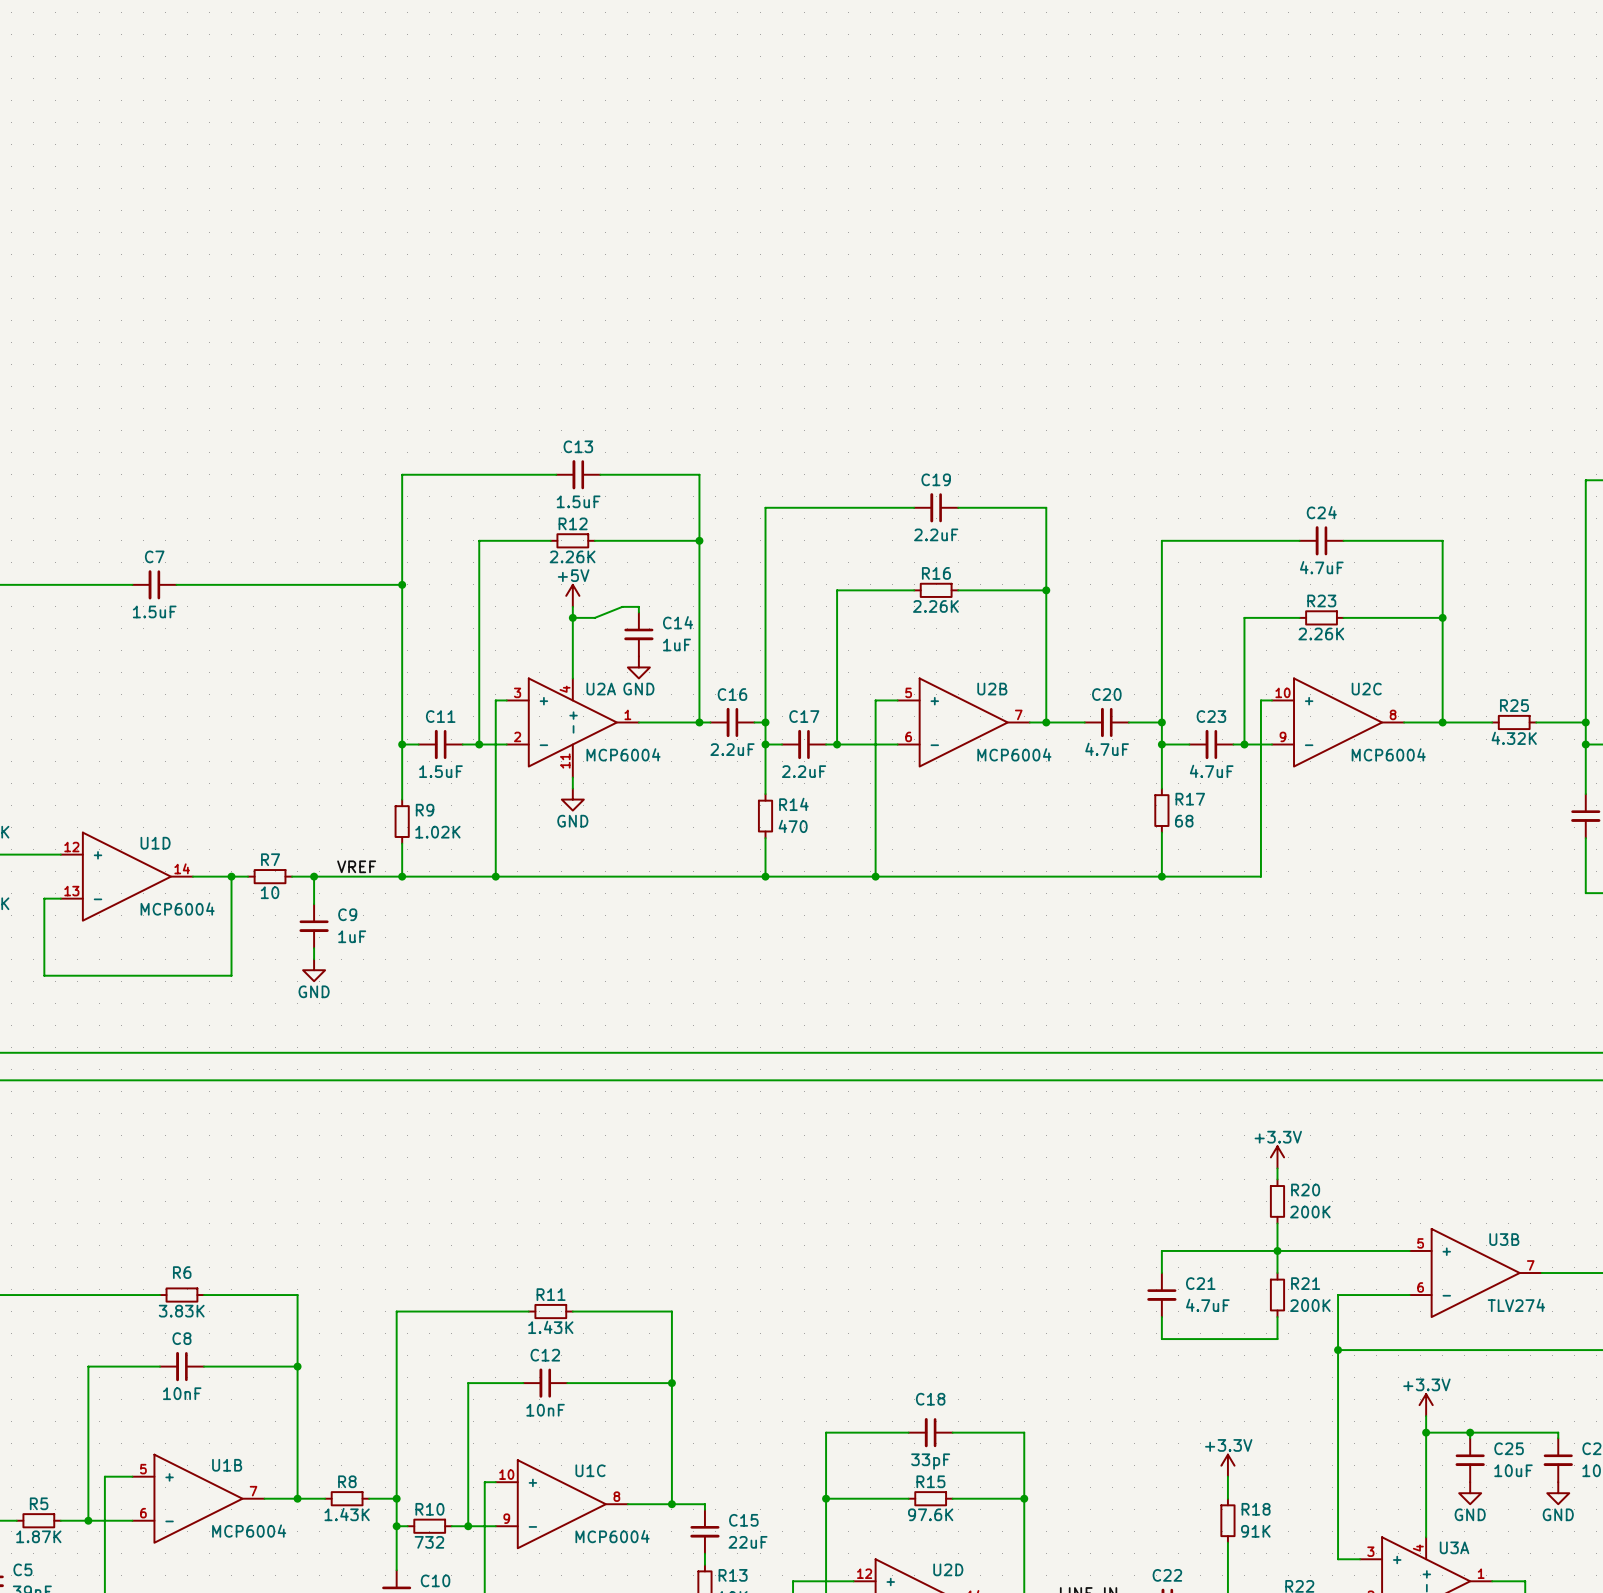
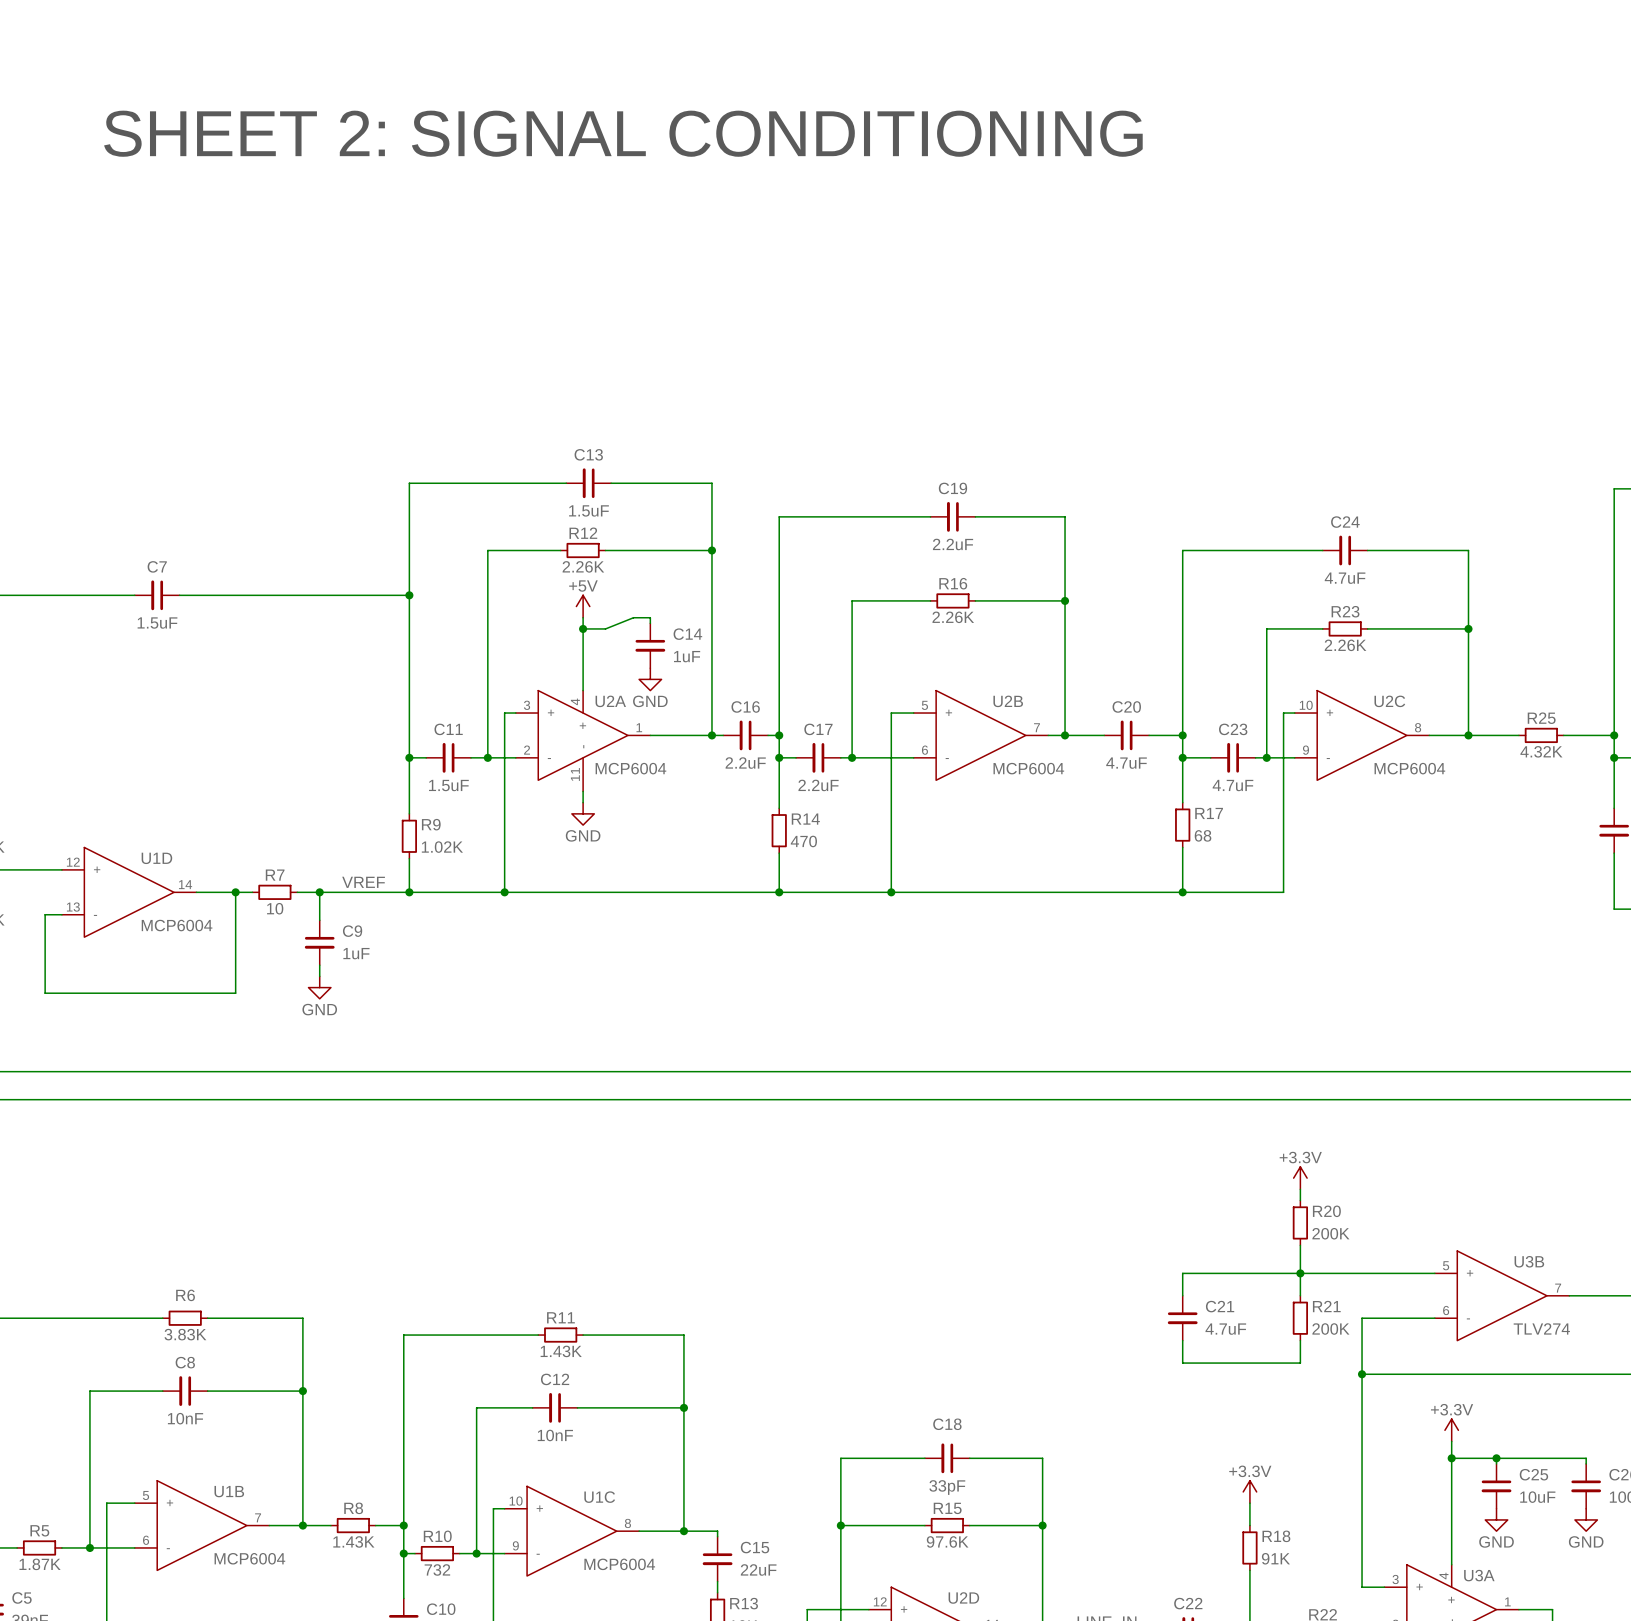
text: none -> SHEET 2: SIGNAL CONDITIONING (623, 133)

